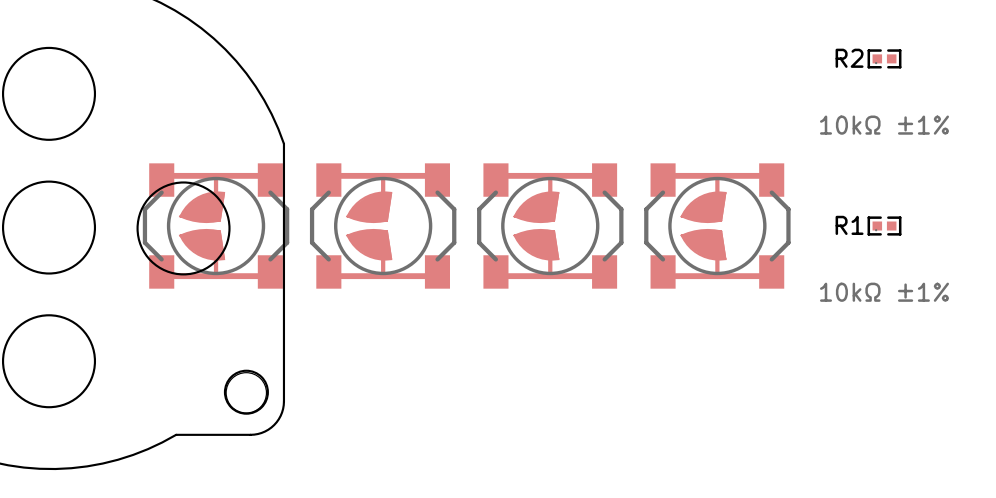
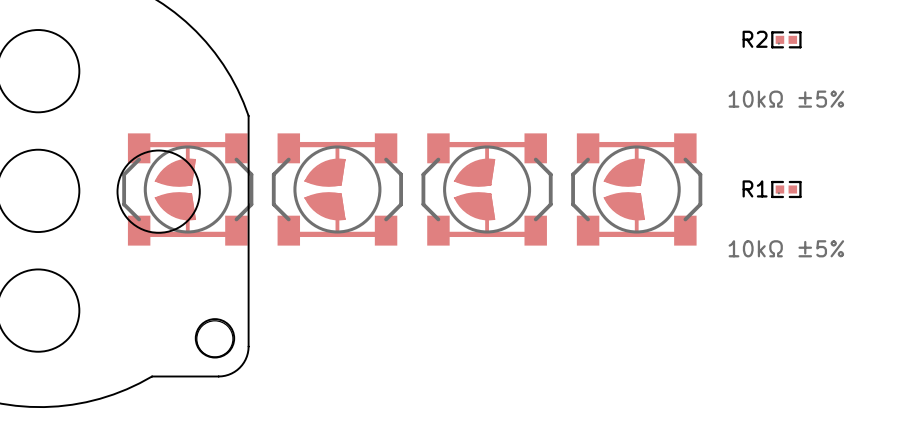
R2 value: 10kΩ ±1% (884, 125) -> 10kΩ ±5% (786, 99)
R1 value: 10kΩ ±1% (884, 292) -> 10kΩ ±5% (786, 248)

